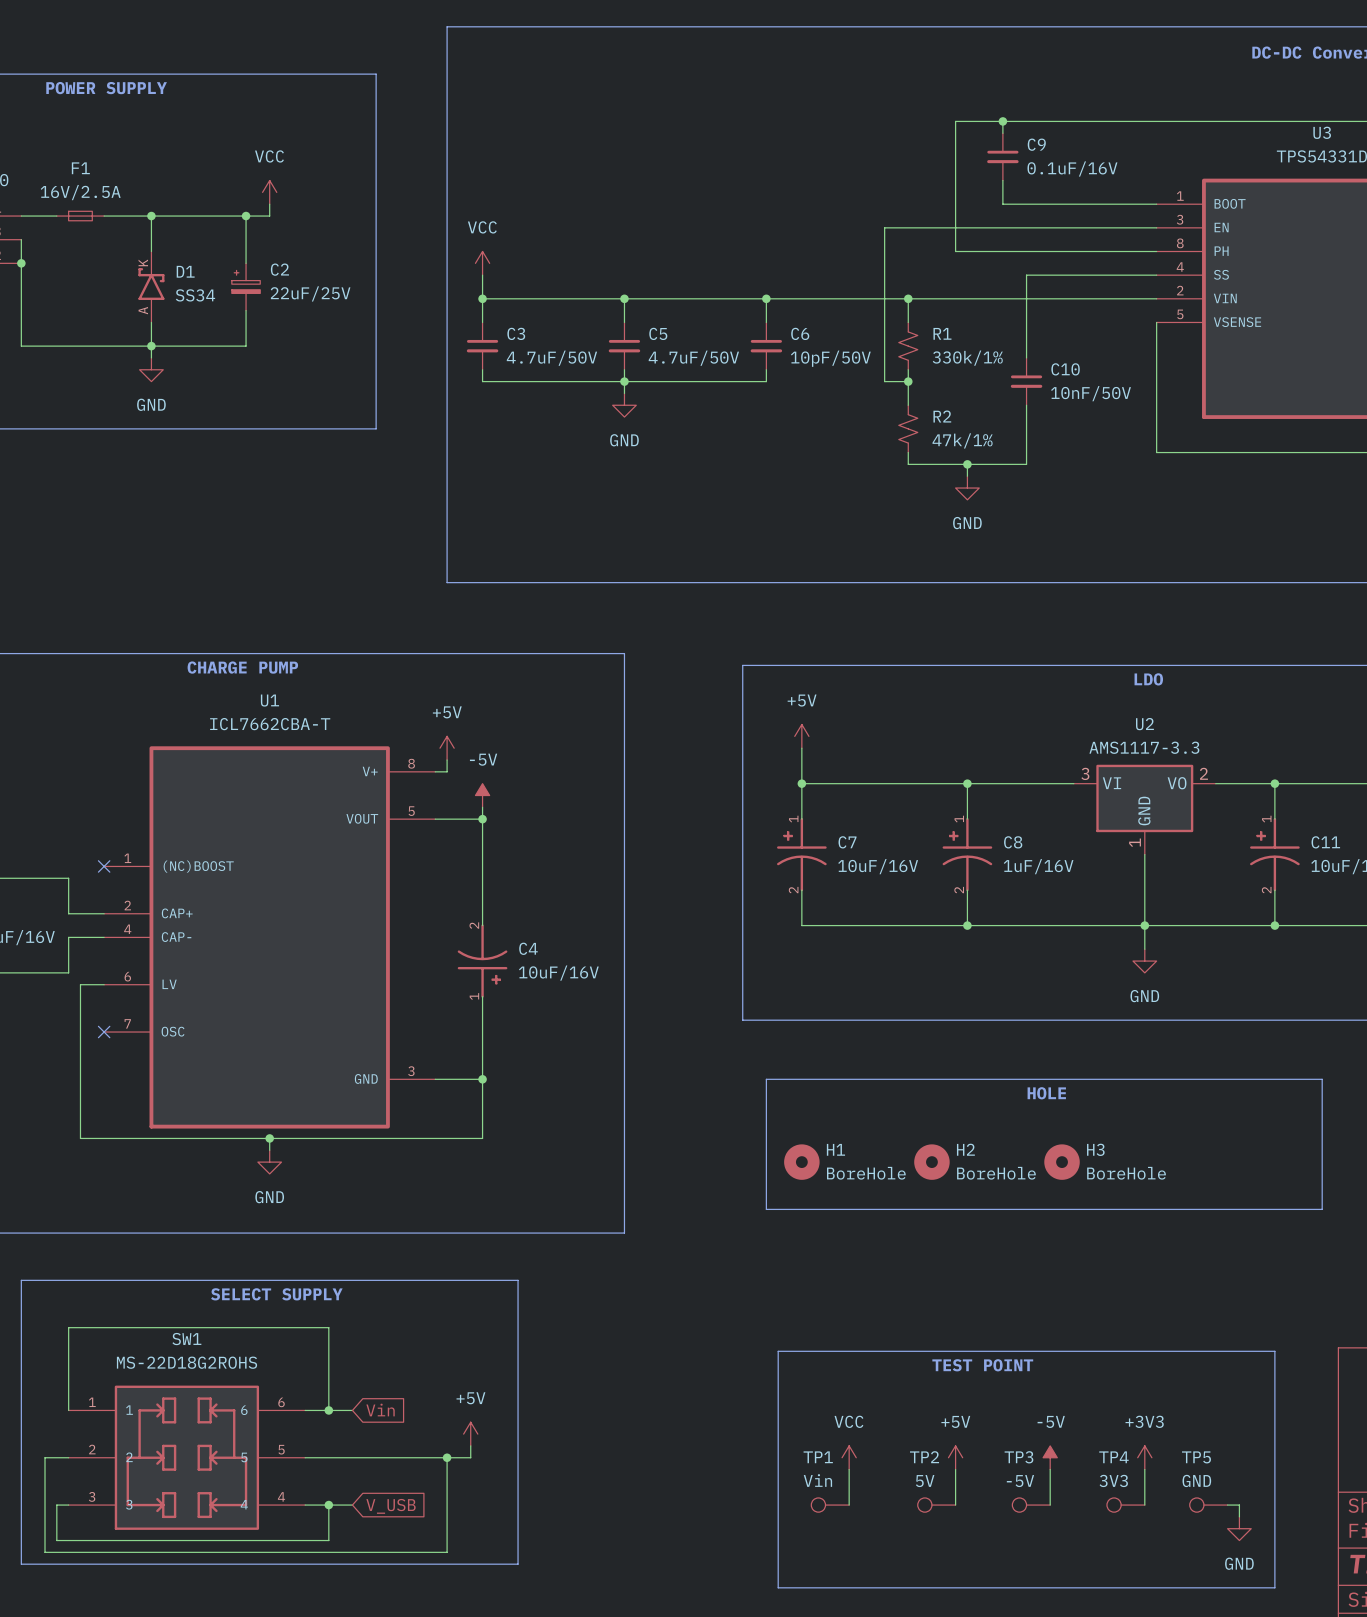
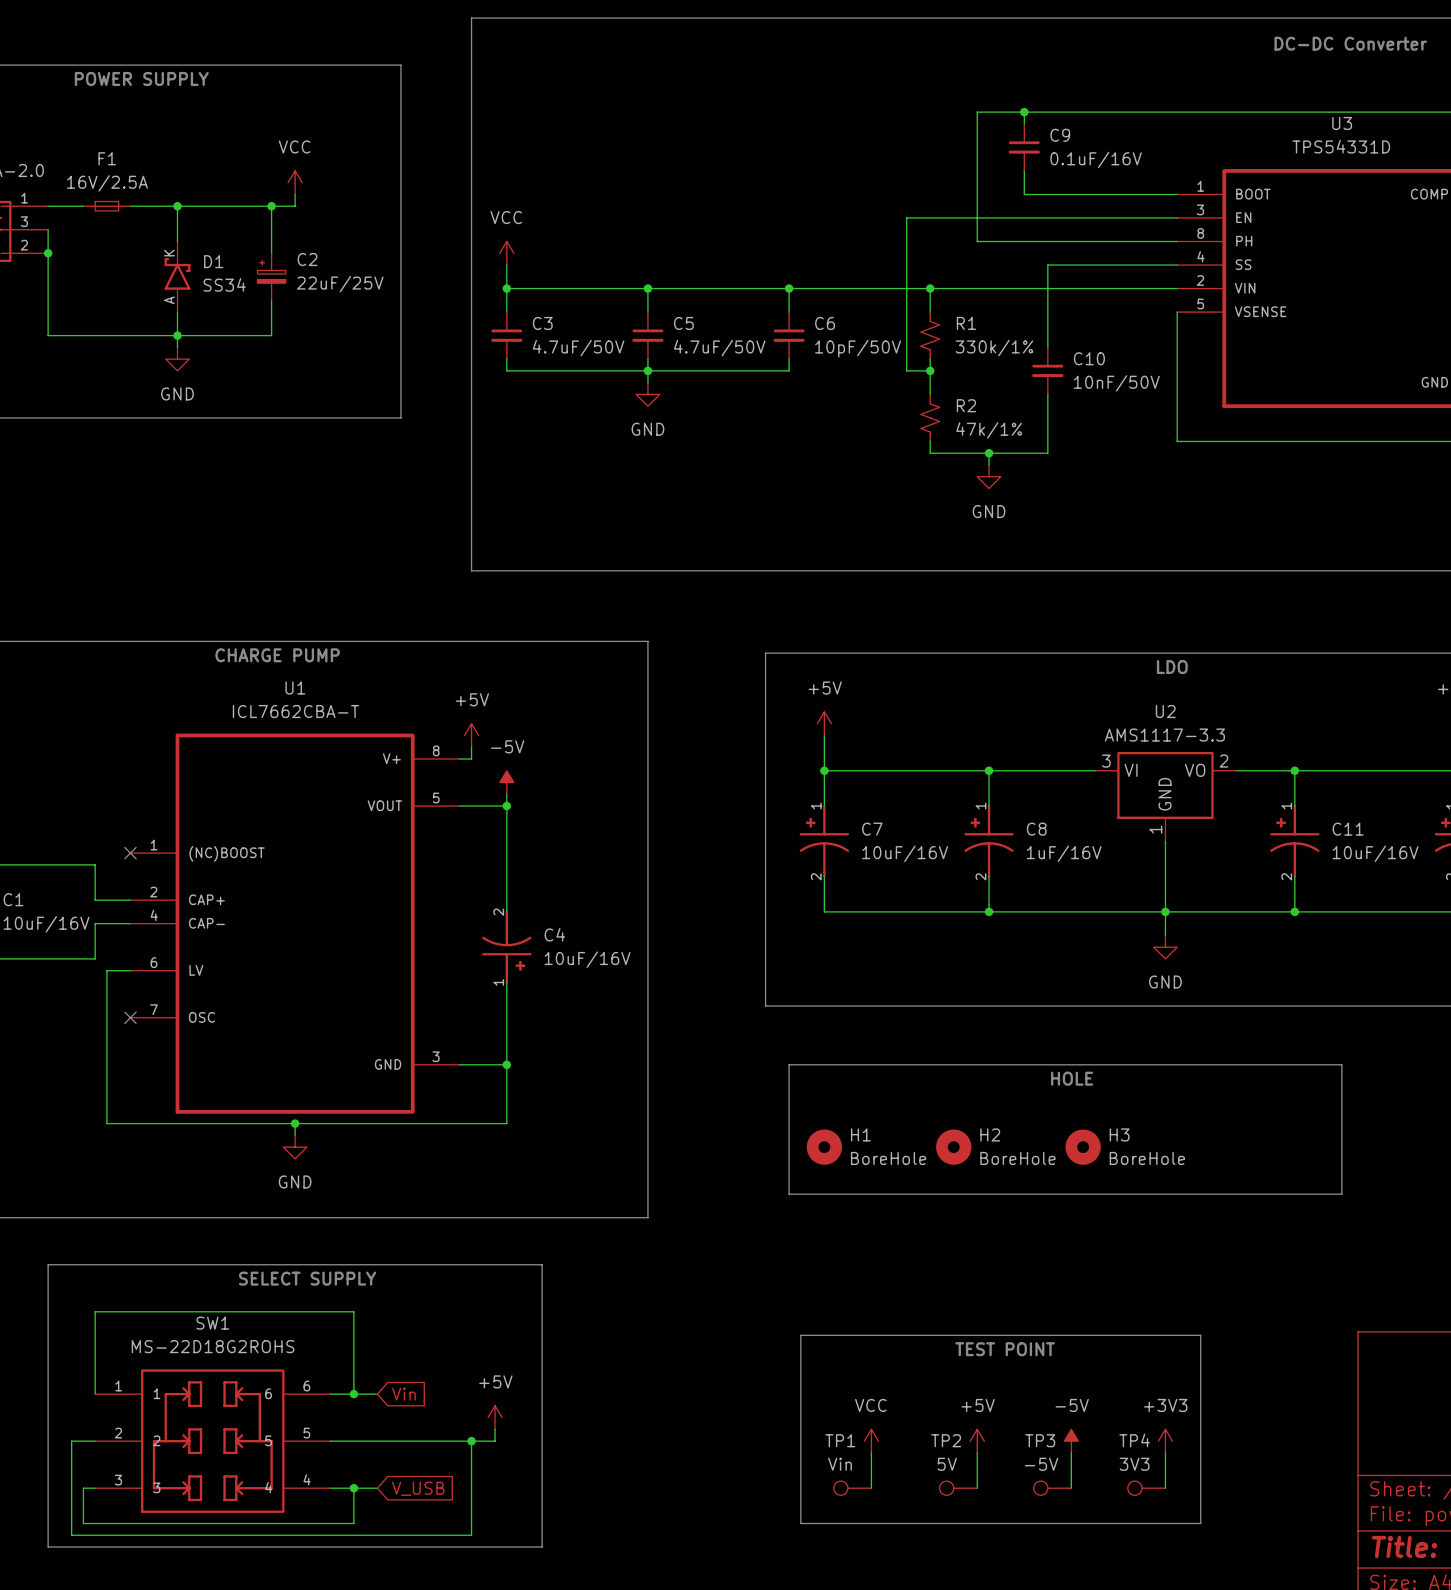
line: (1180, 1351) (1274, 1351) (1274, 1587) (778, 1587) (778, 1540) -> (1200, 1335) (1200, 1523) (800, 1523)
TP5: GND (1208, 1505) -> none
wire: (1227, 1505) (1239, 1505) (1239, 1516) -> none
power symbol: GND (1239, 1528) -> none

